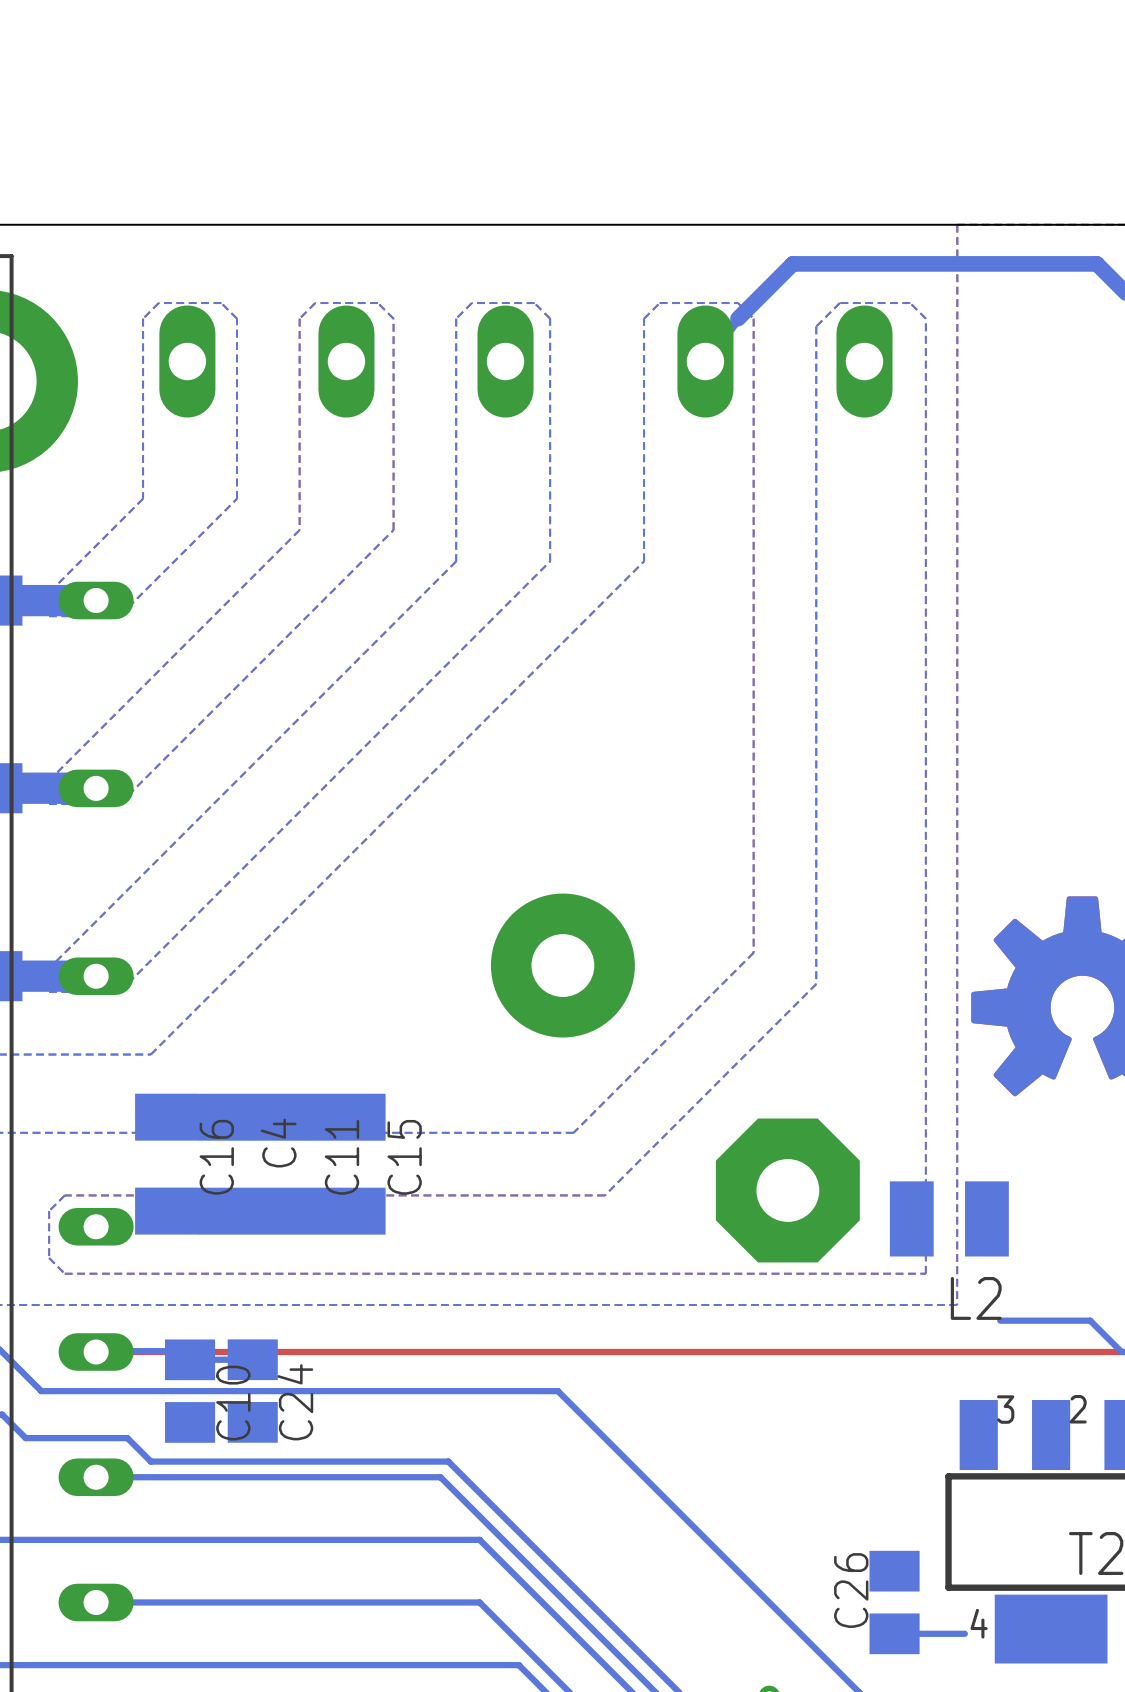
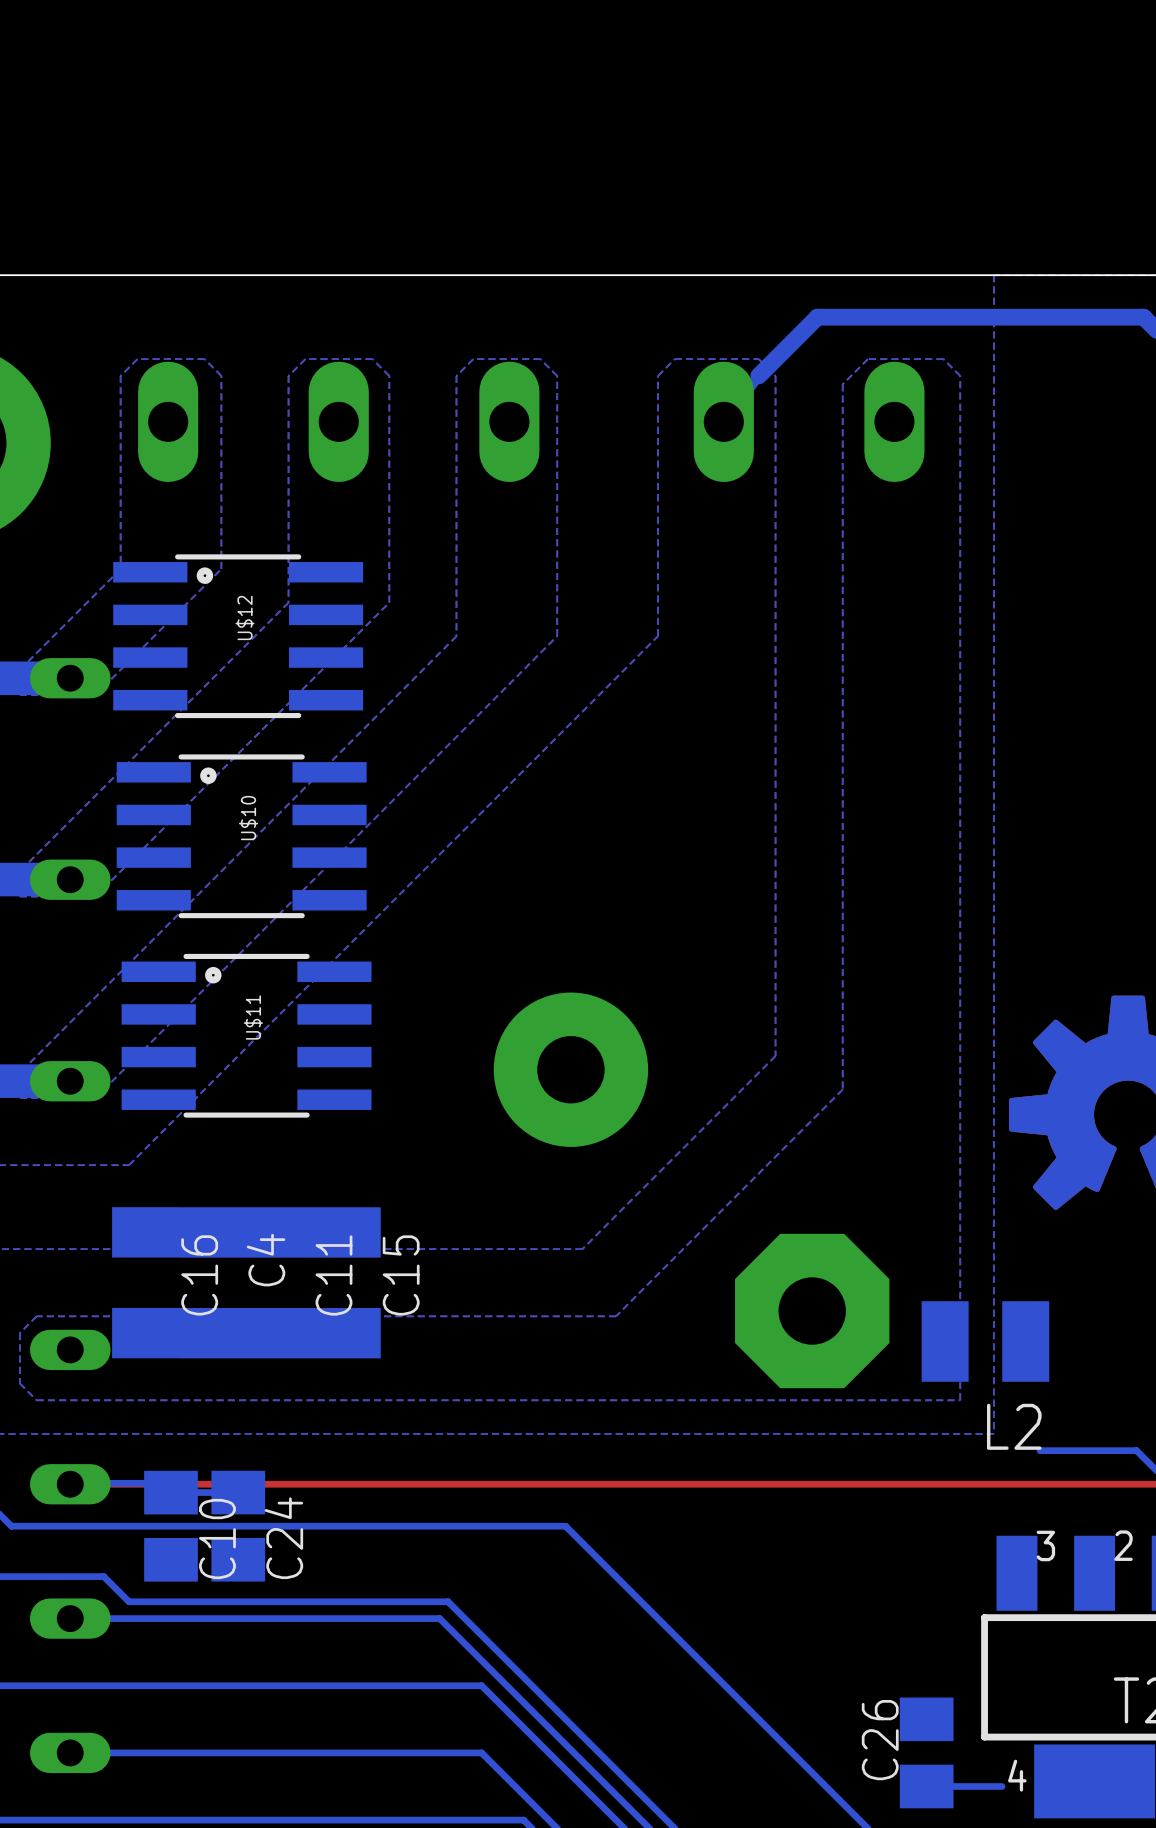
U$12: none -> (238, 636)
U$10: none -> (241, 836)
U$11: none -> (246, 1035)

